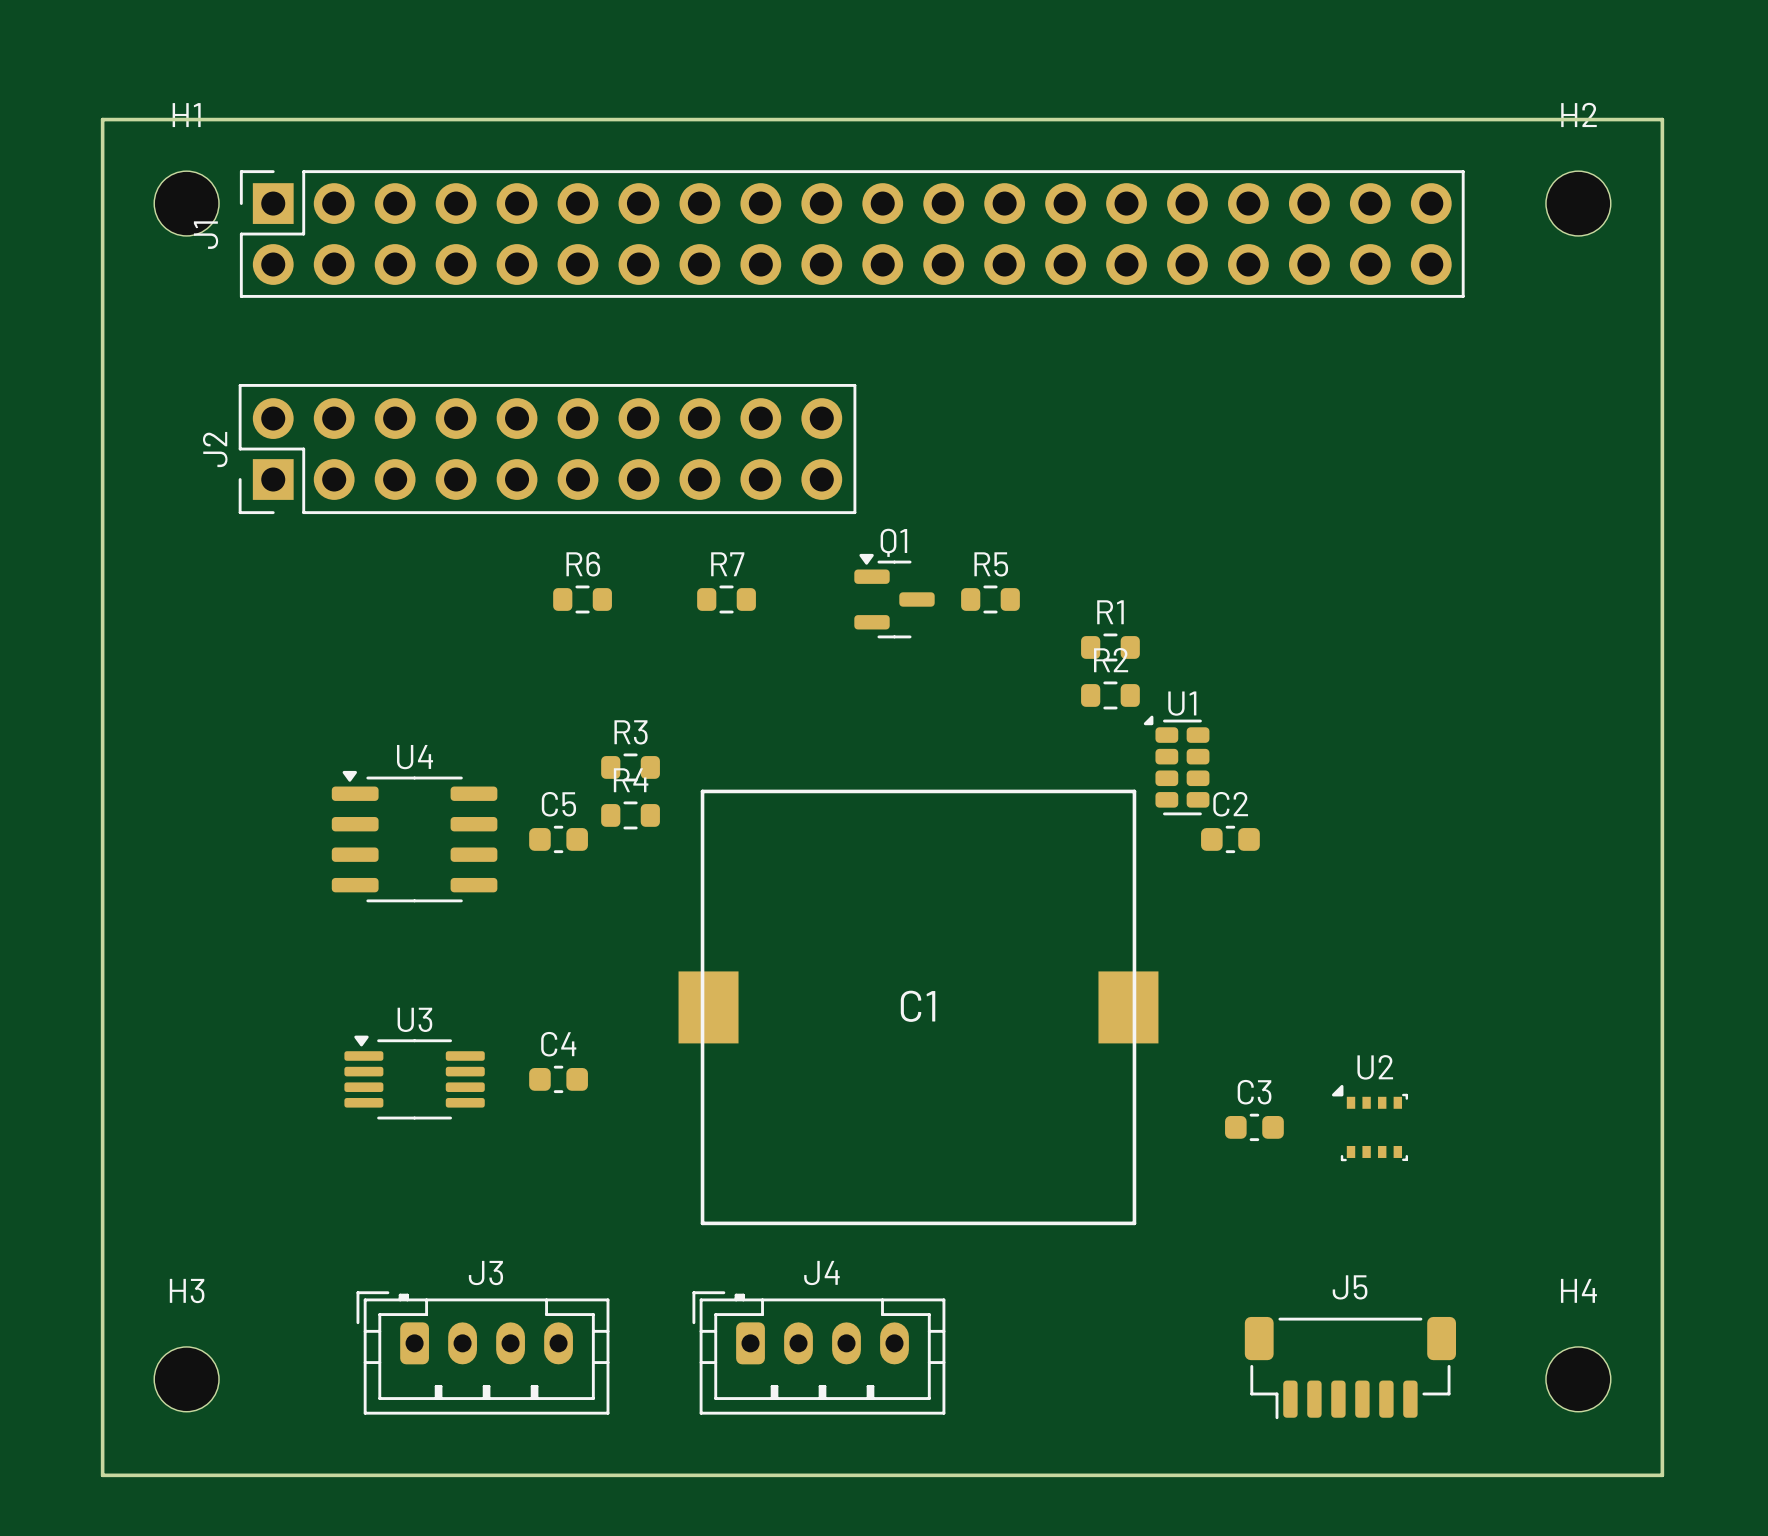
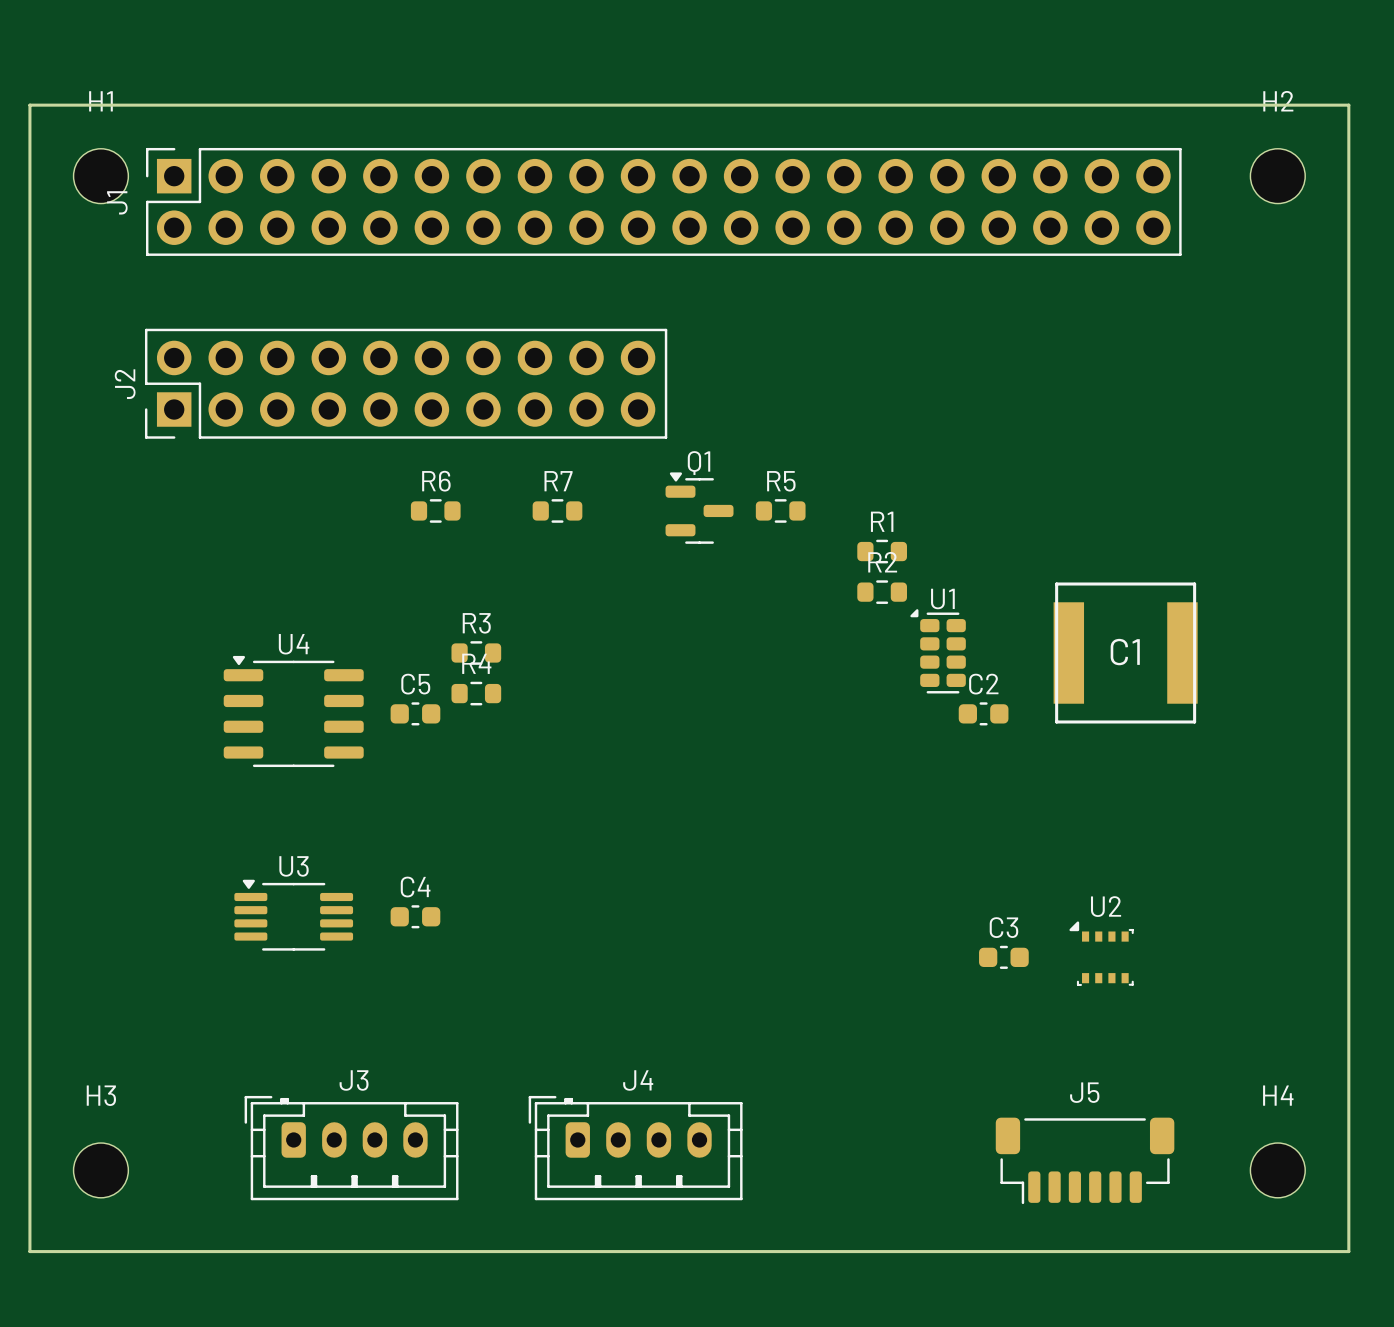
C1 footprint: [678, 789, 1159, 1226] -> [1053, 582, 1198, 724]

